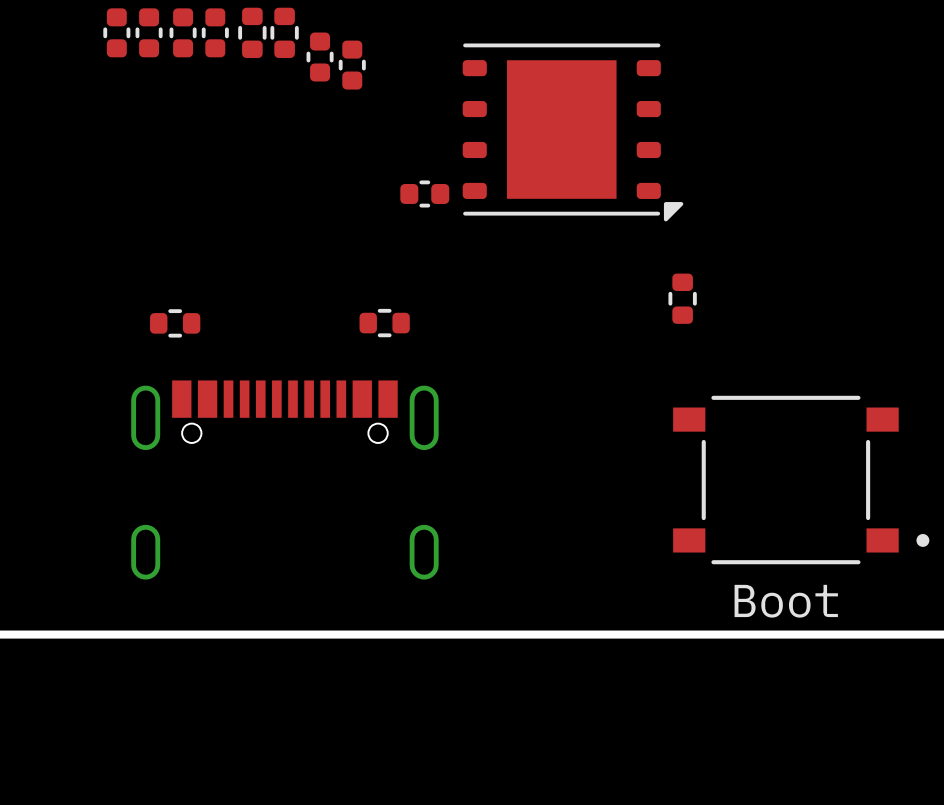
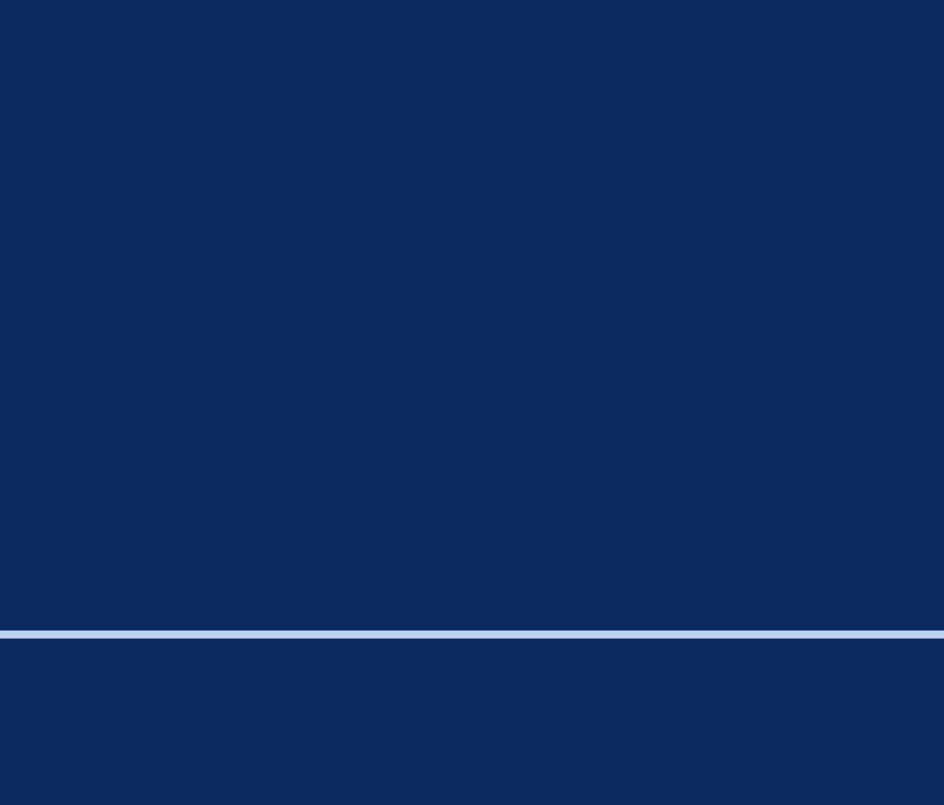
part: (116, 32) -> none
part: (149, 32) -> none
part: (183, 32) -> none
part: (215, 32) -> none
part: (252, 32) -> none
part: (284, 32) -> none
part: (320, 57) -> none
part: (352, 65) -> none
part: (572, 132) -> none
part: (424, 193) -> none
part: (682, 298) -> none
part: (175, 323) -> none
part: (384, 323) -> none
part: (284, 480) -> none
part: (801, 480) -> none
text: Boot (786, 601) -> none

